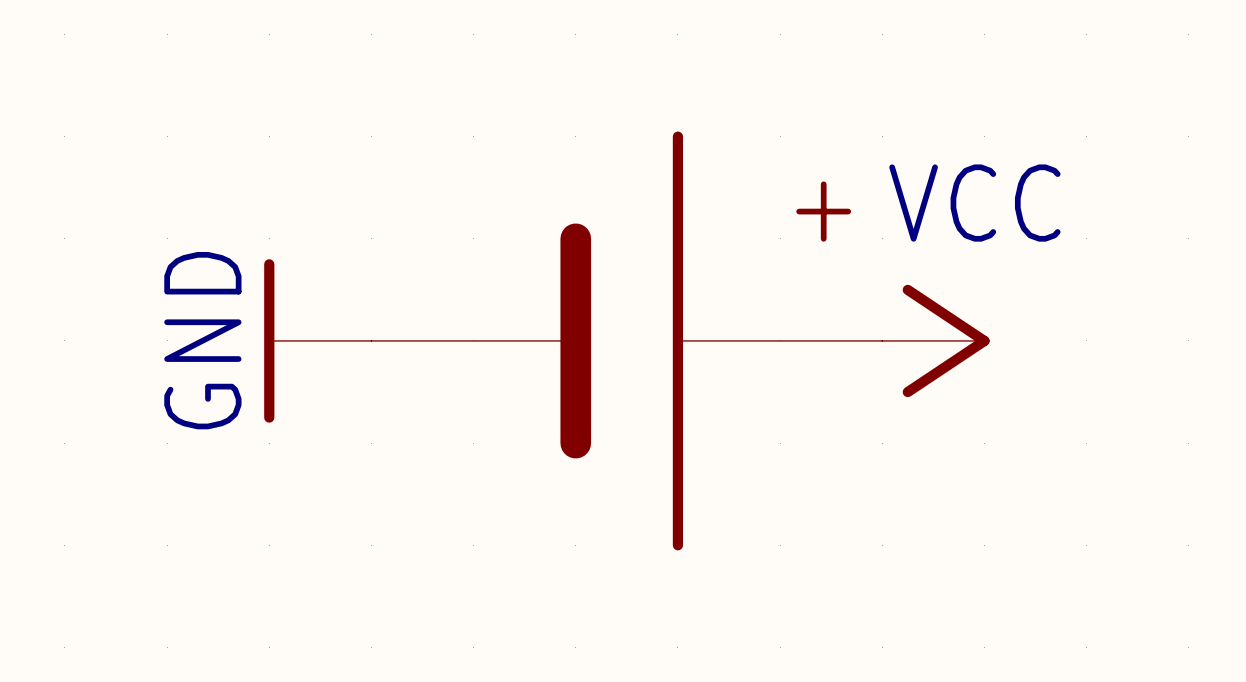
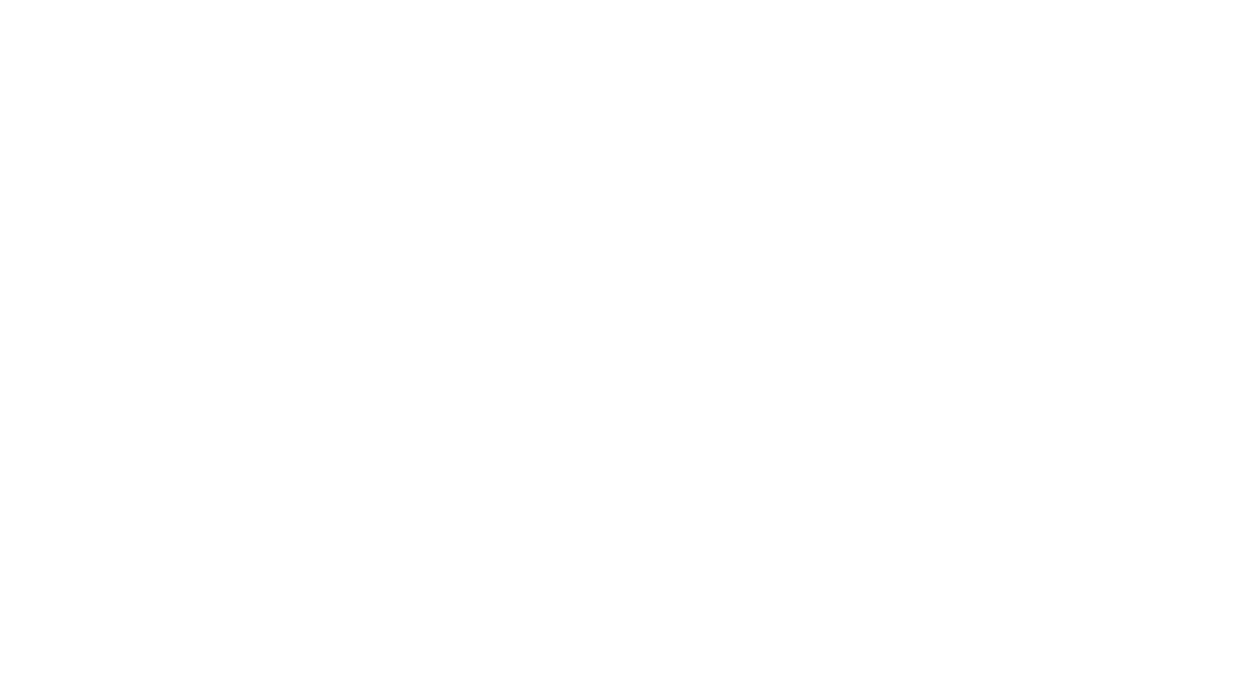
power symbol: GND (317, 340) -> none
part: (626, 340) -> none
power symbol: VCC (935, 340) -> none

